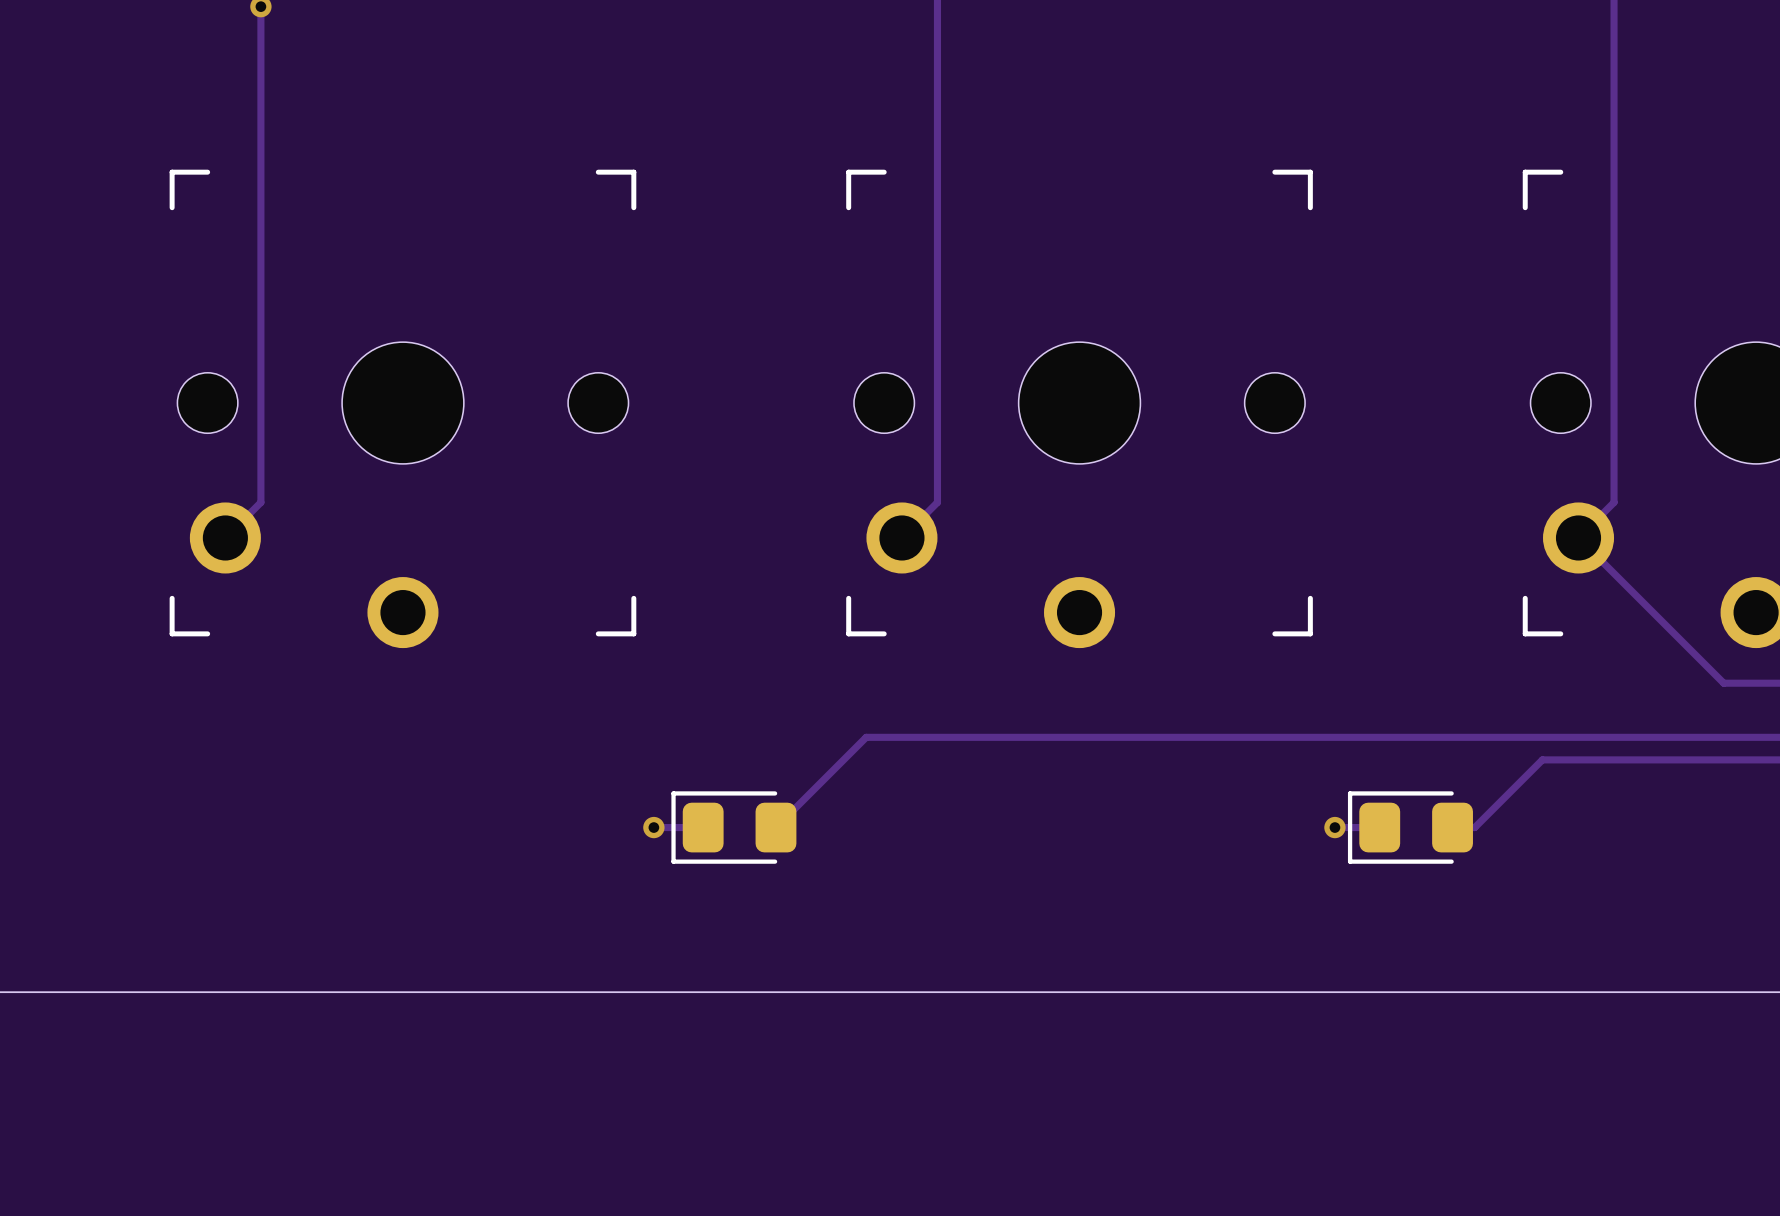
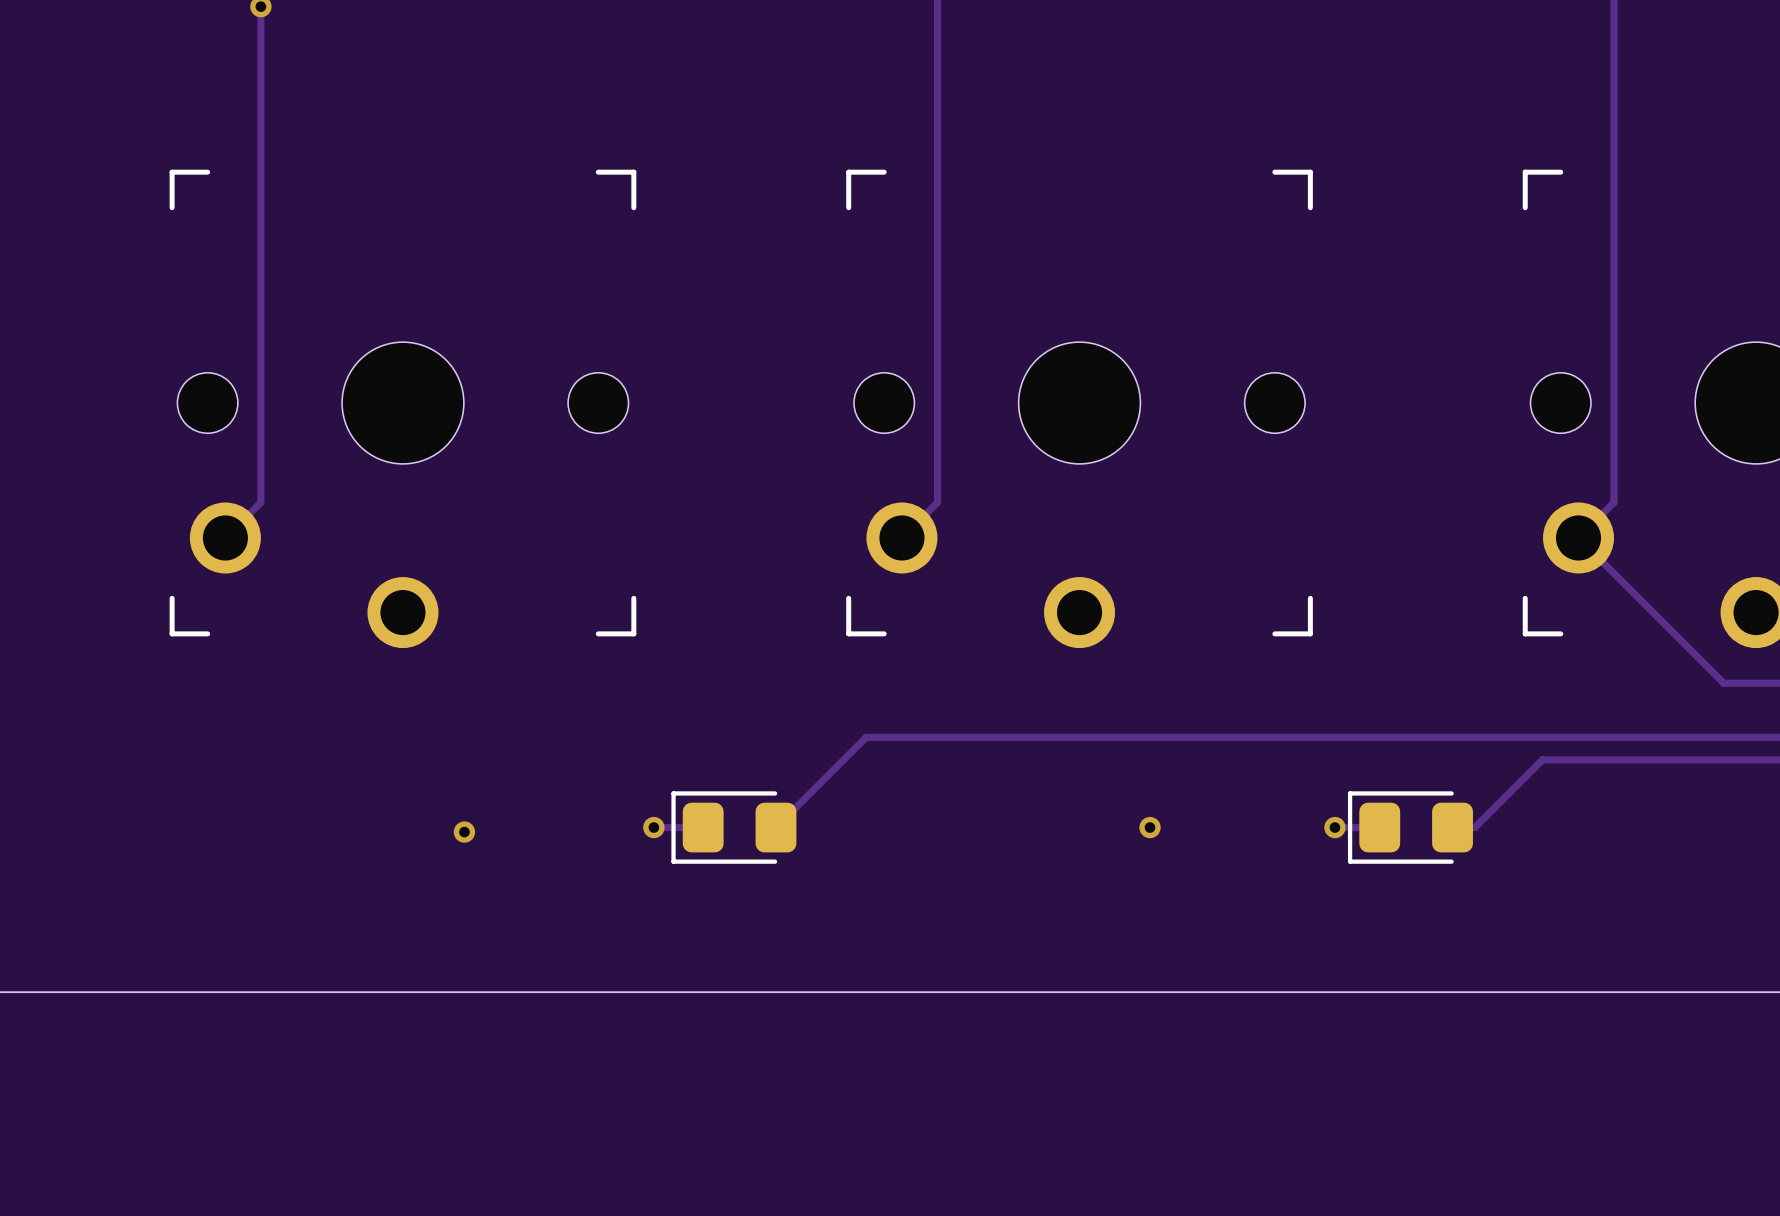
via: none -> (1150, 827)
via: none -> (464, 832)

